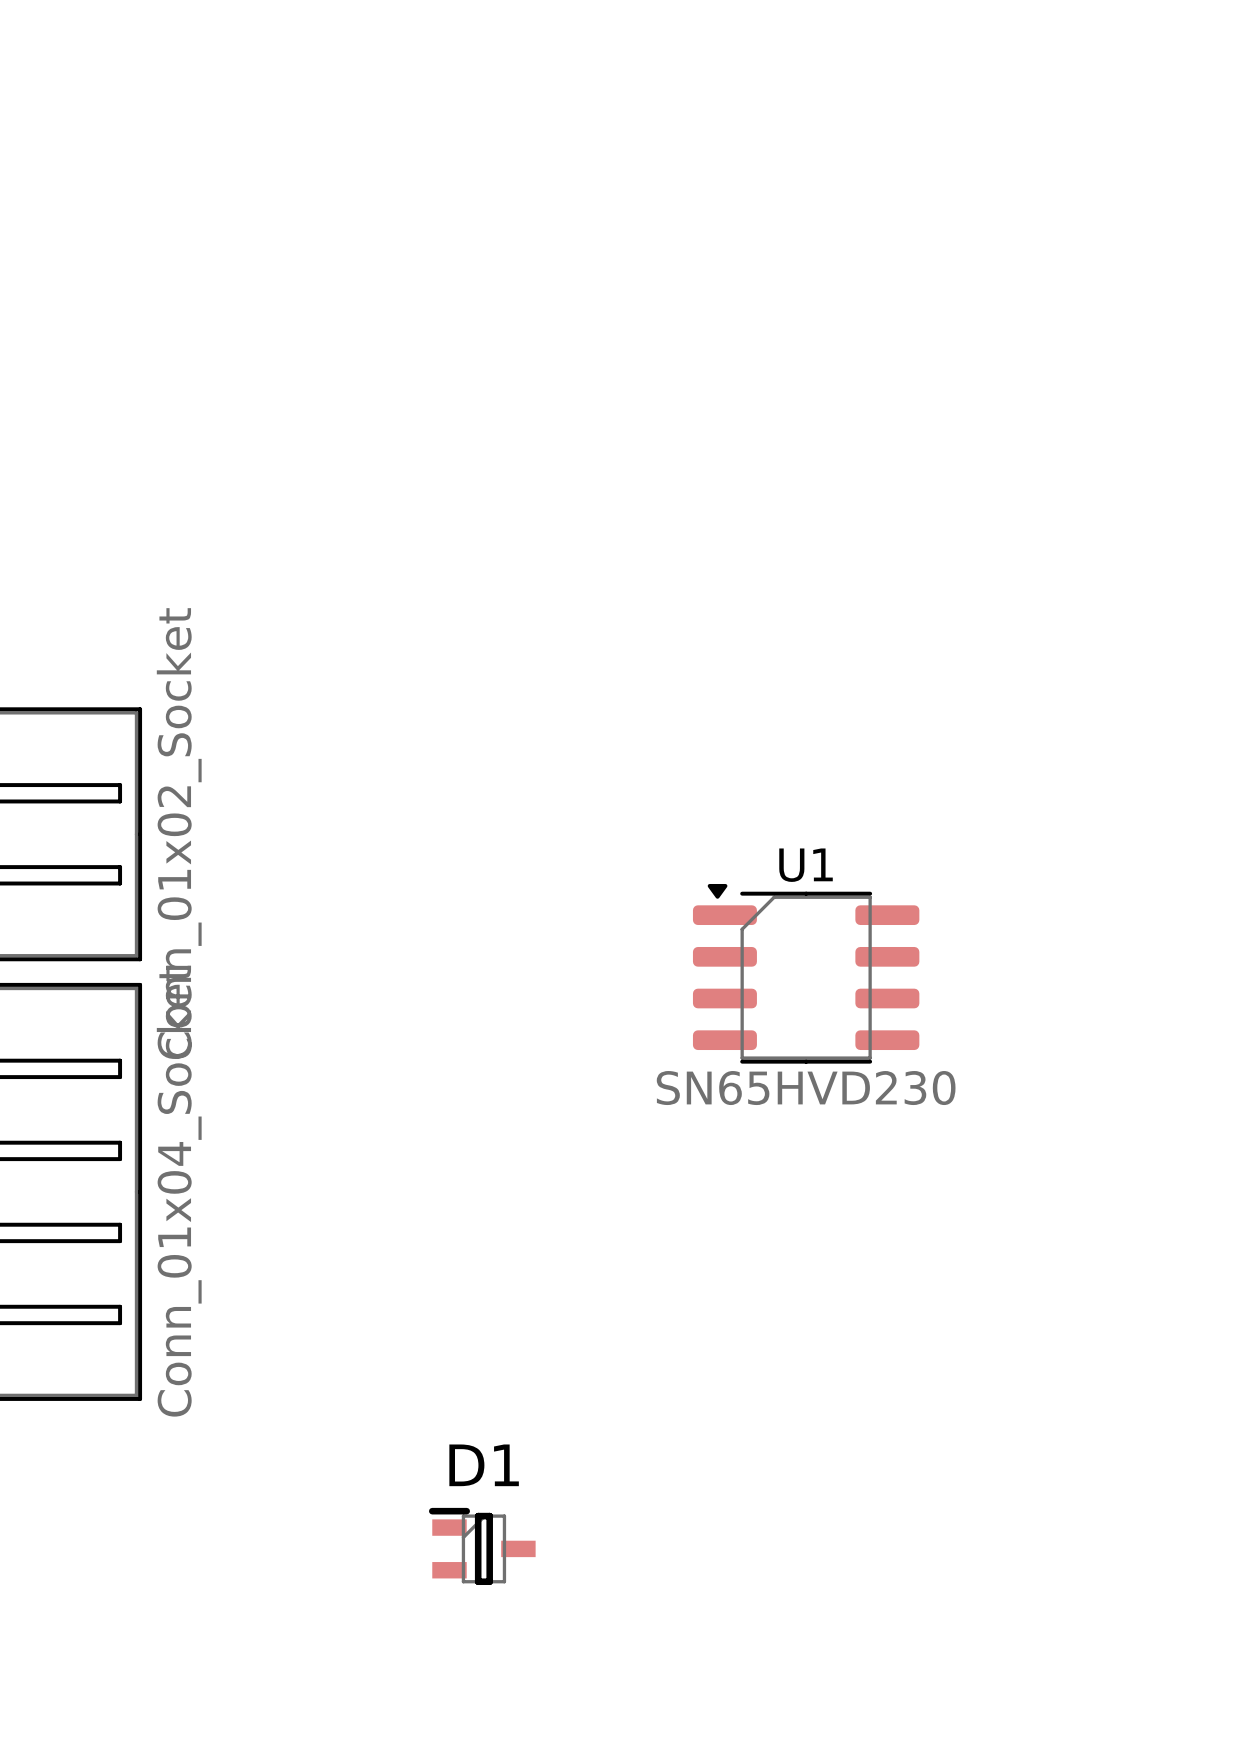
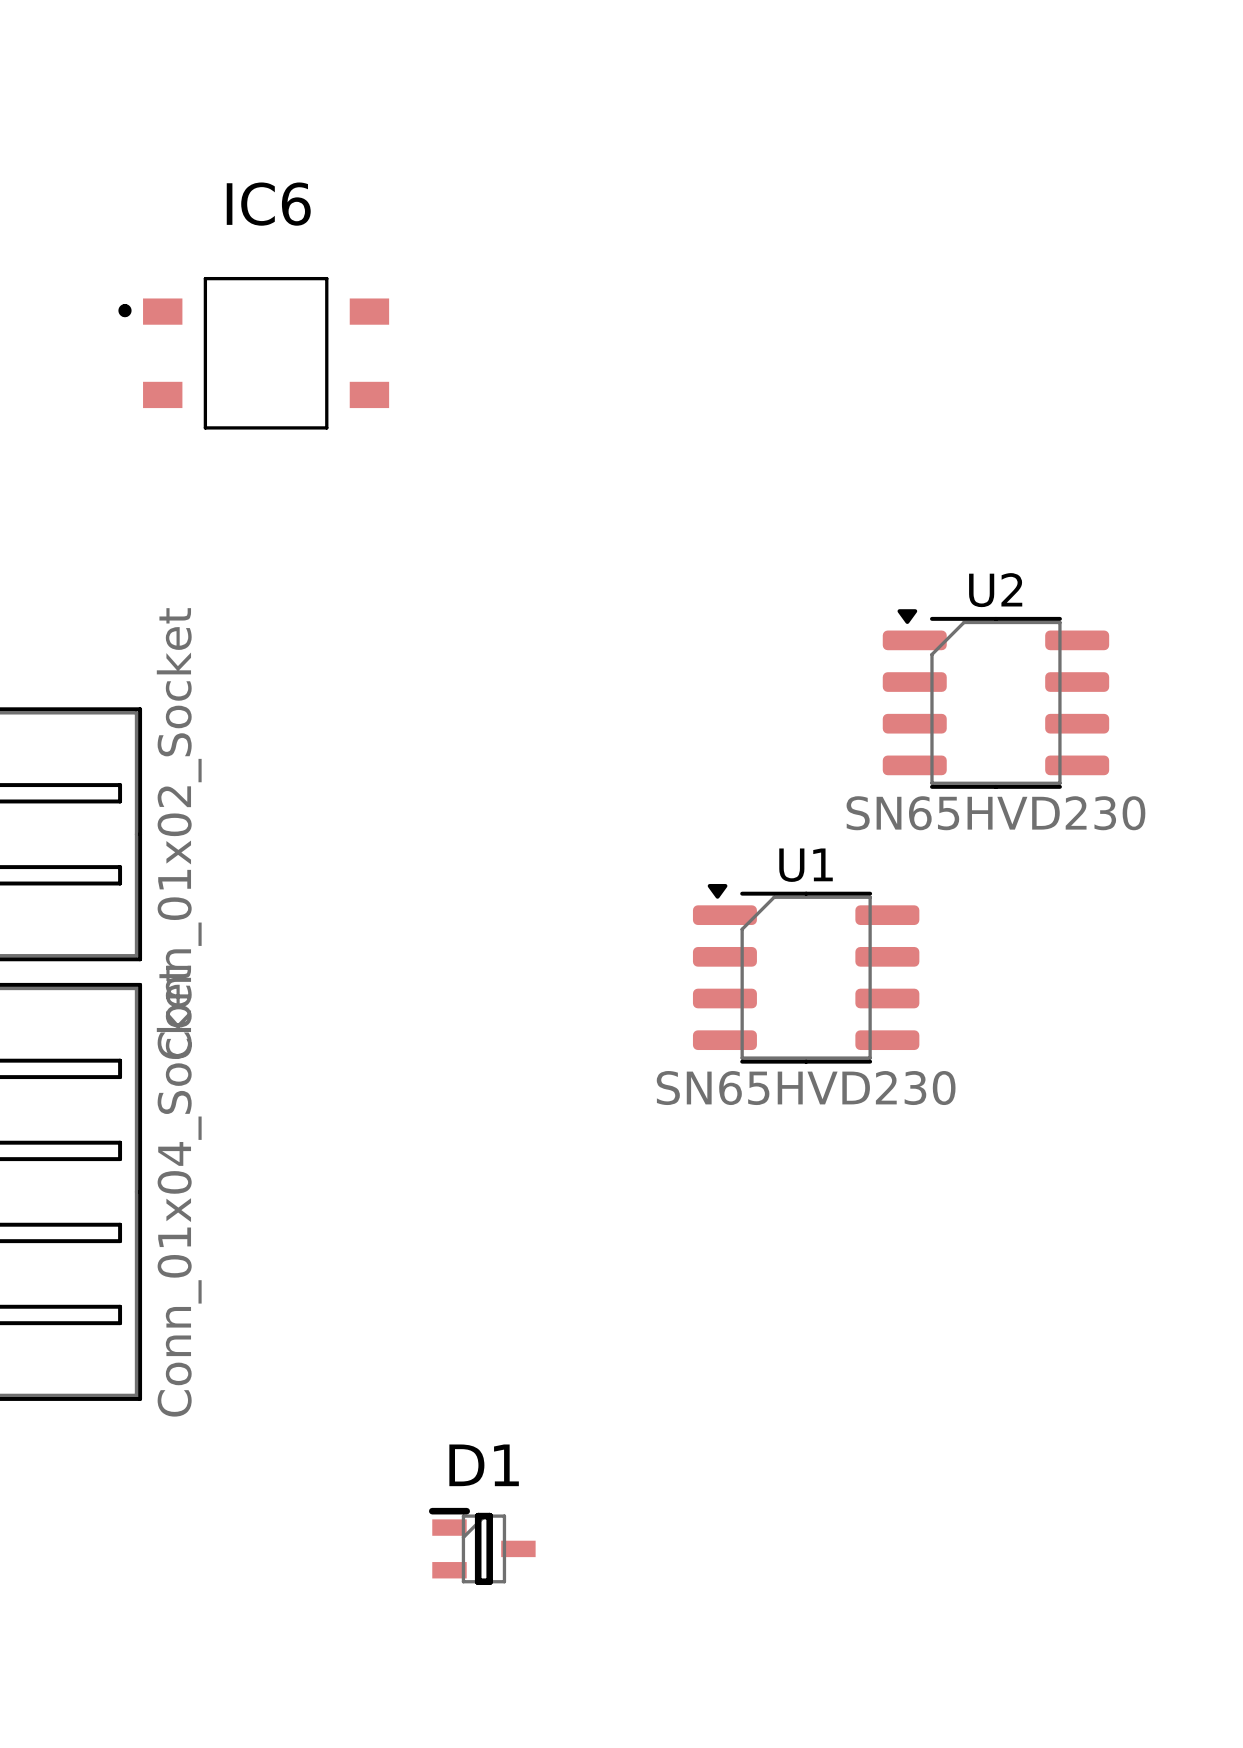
IC6: none -> (253, 353)
U2: none -> SN65HVD230 (995, 699)

